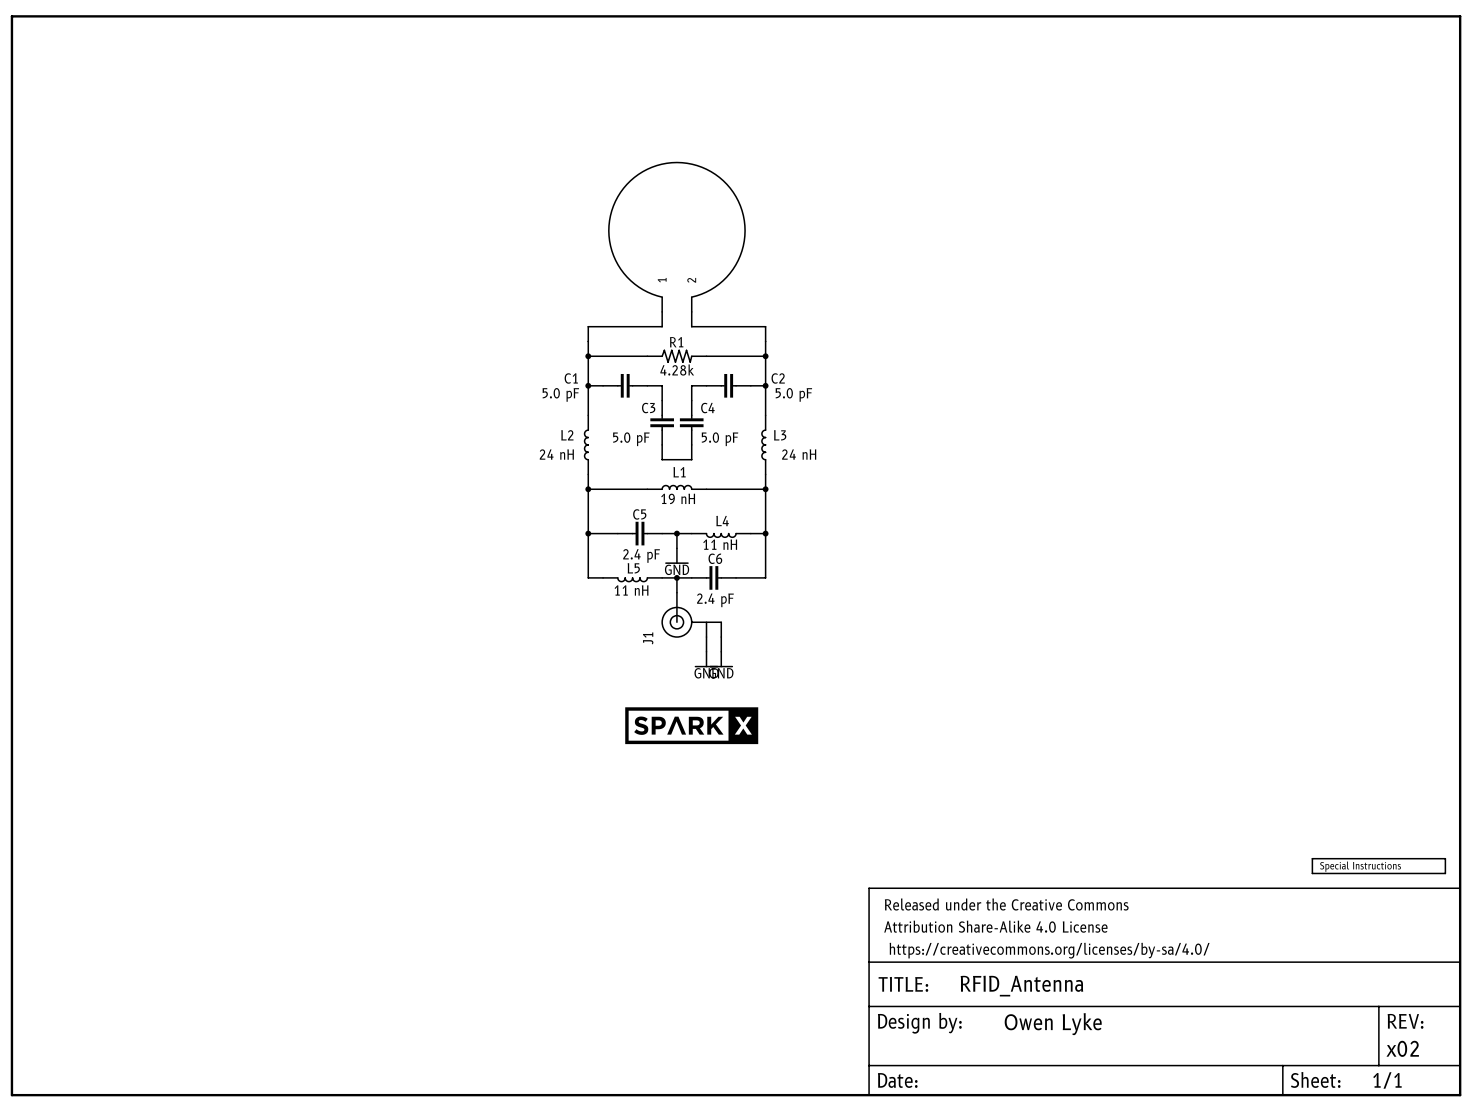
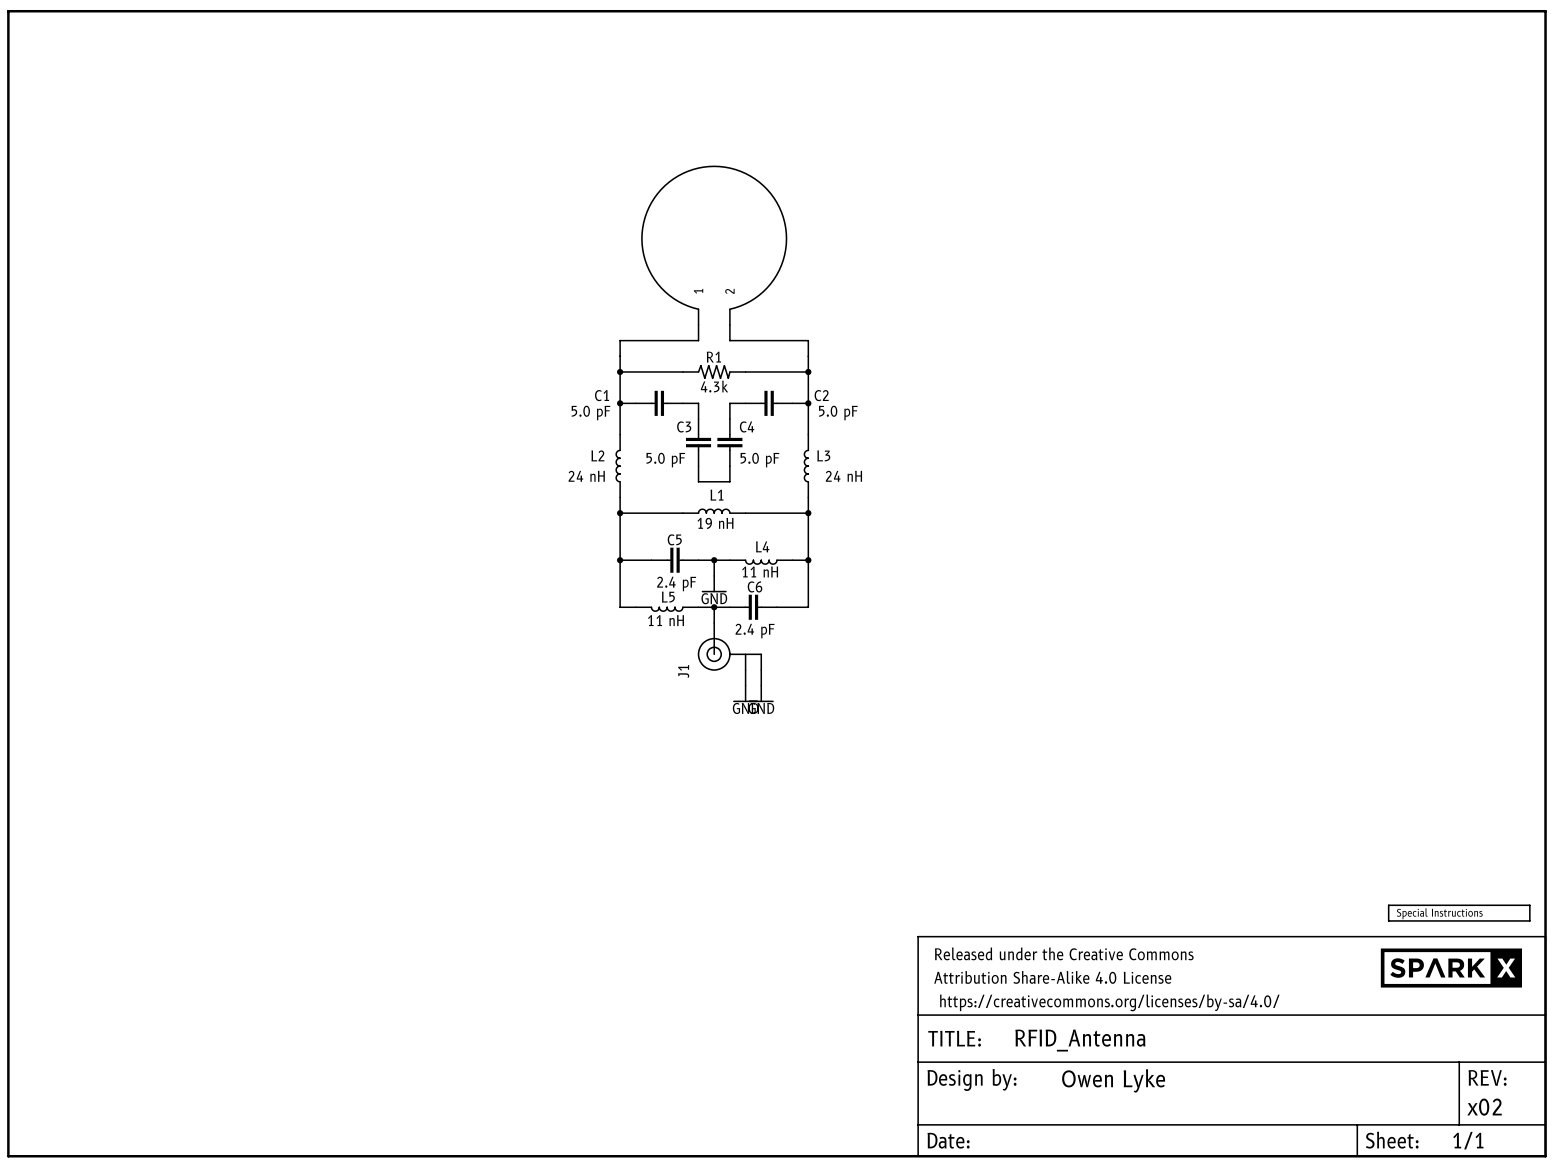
R1 value: 4.28k (677, 370) -> 4.3k (714, 386)
part: (691, 725) -> none
part: none -> (1451, 968)

